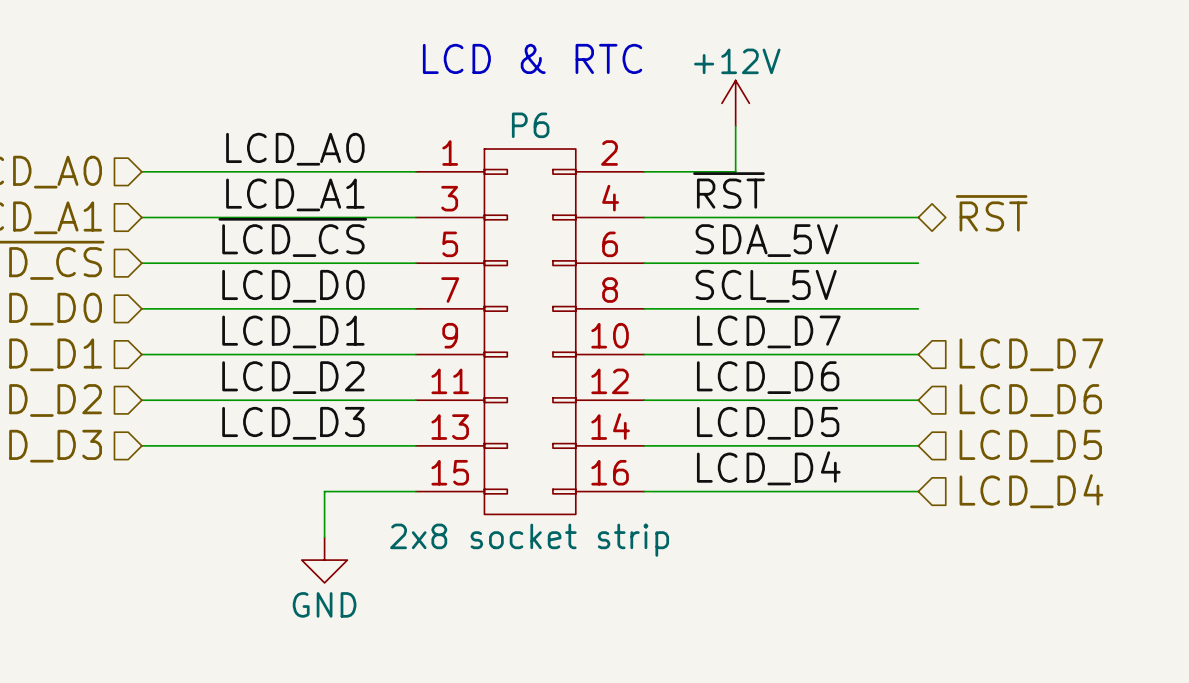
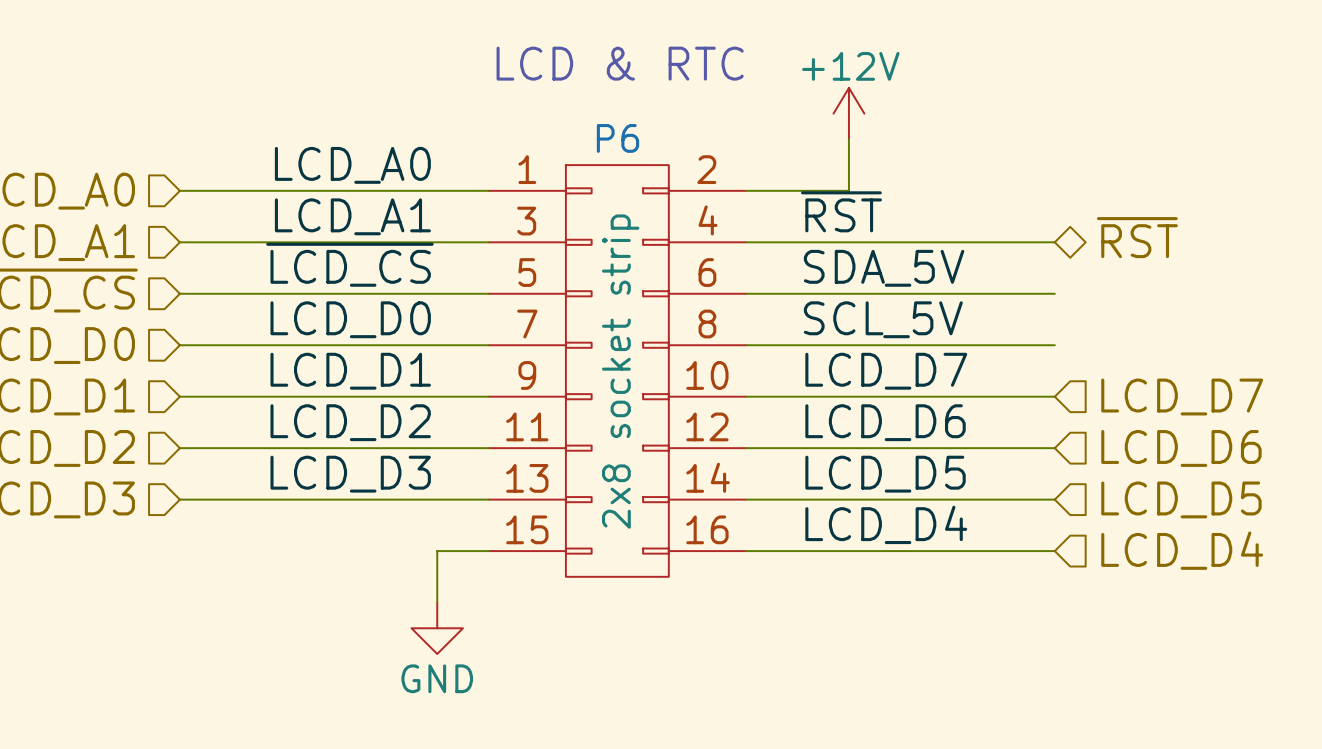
wire: (370, 491) (324, 491) (324, 537) -> (437, 551) (437, 602)
P6 value rotation: 0° (529, 540) -> 90° counterclockwise (620, 371)
power symbol position: GND (324, 560) -> GND (437, 628)

